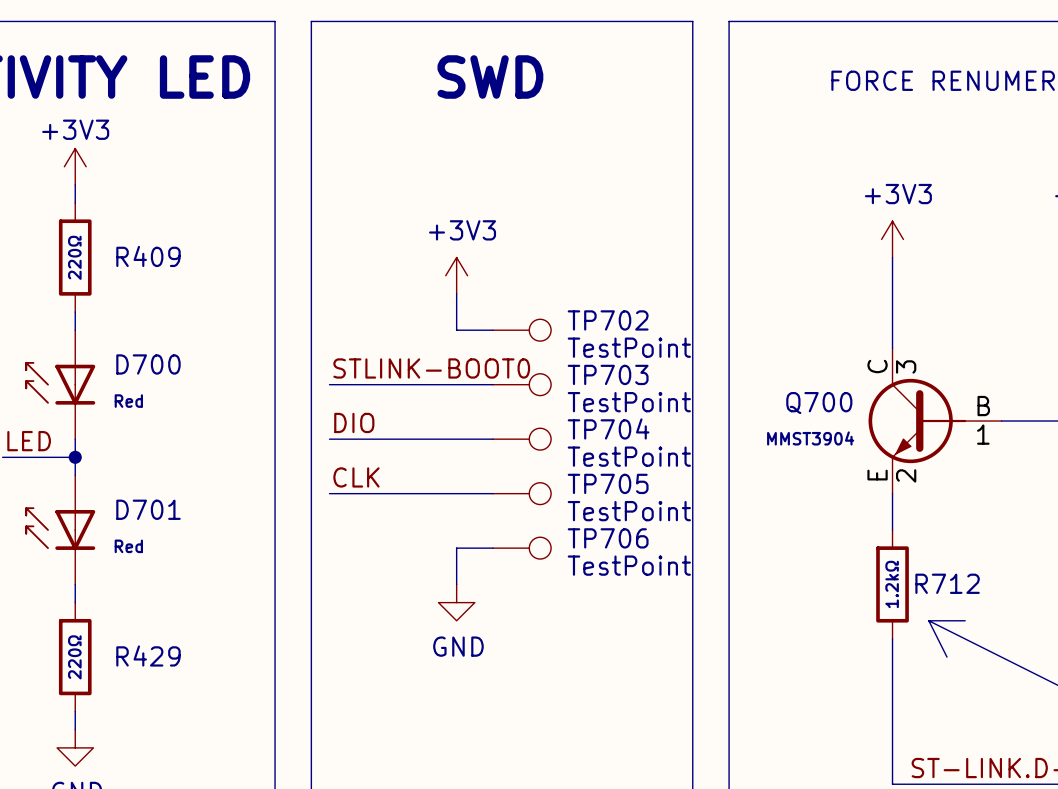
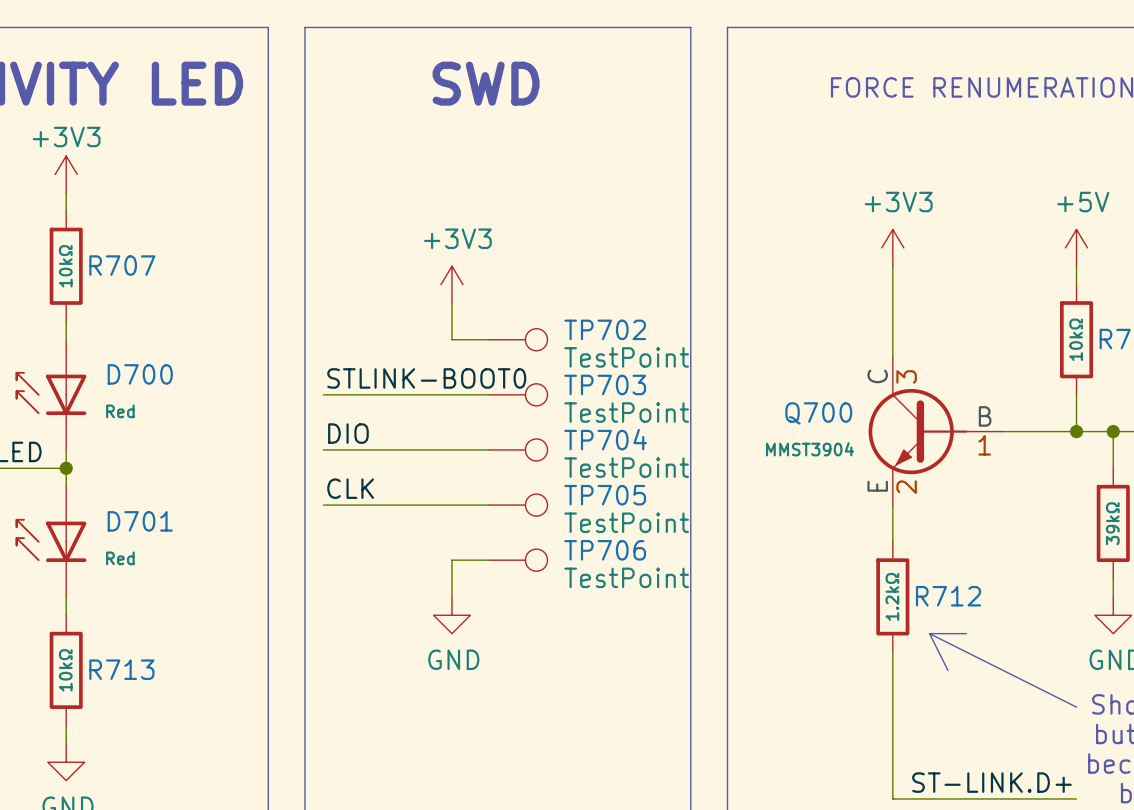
R409 name: R409 (148, 256) -> R707 (122, 265)
R409 value: 220Ω (74, 257) -> 10kΩ (65, 266)
R429 name: R429 (148, 655) -> R713 (121, 669)
R429 value: 220Ω (74, 657) -> 10kΩ (65, 670)

